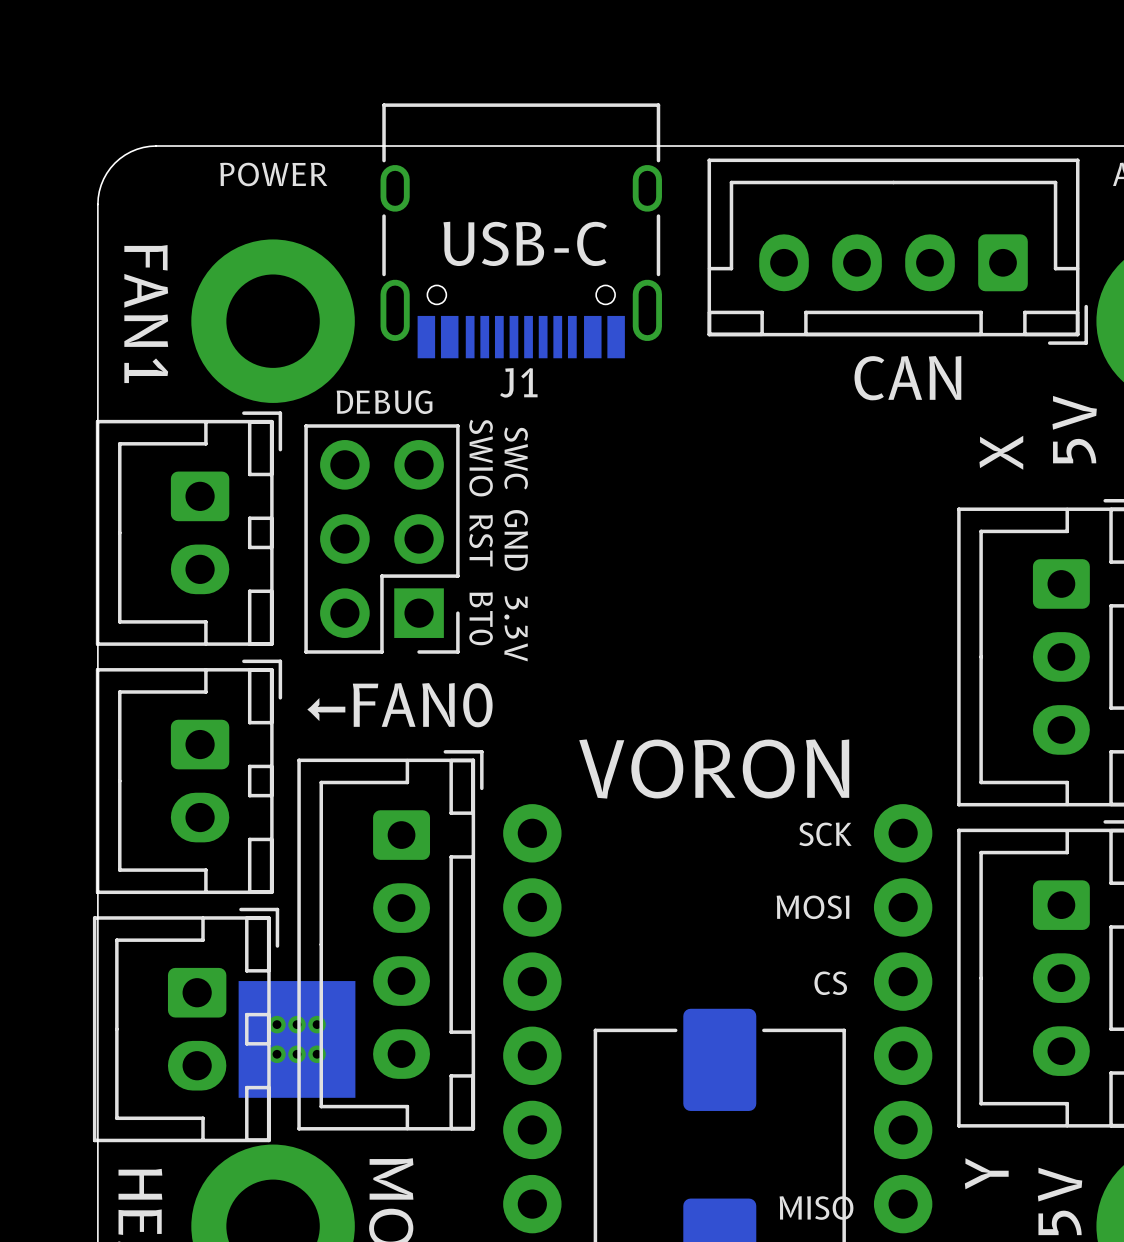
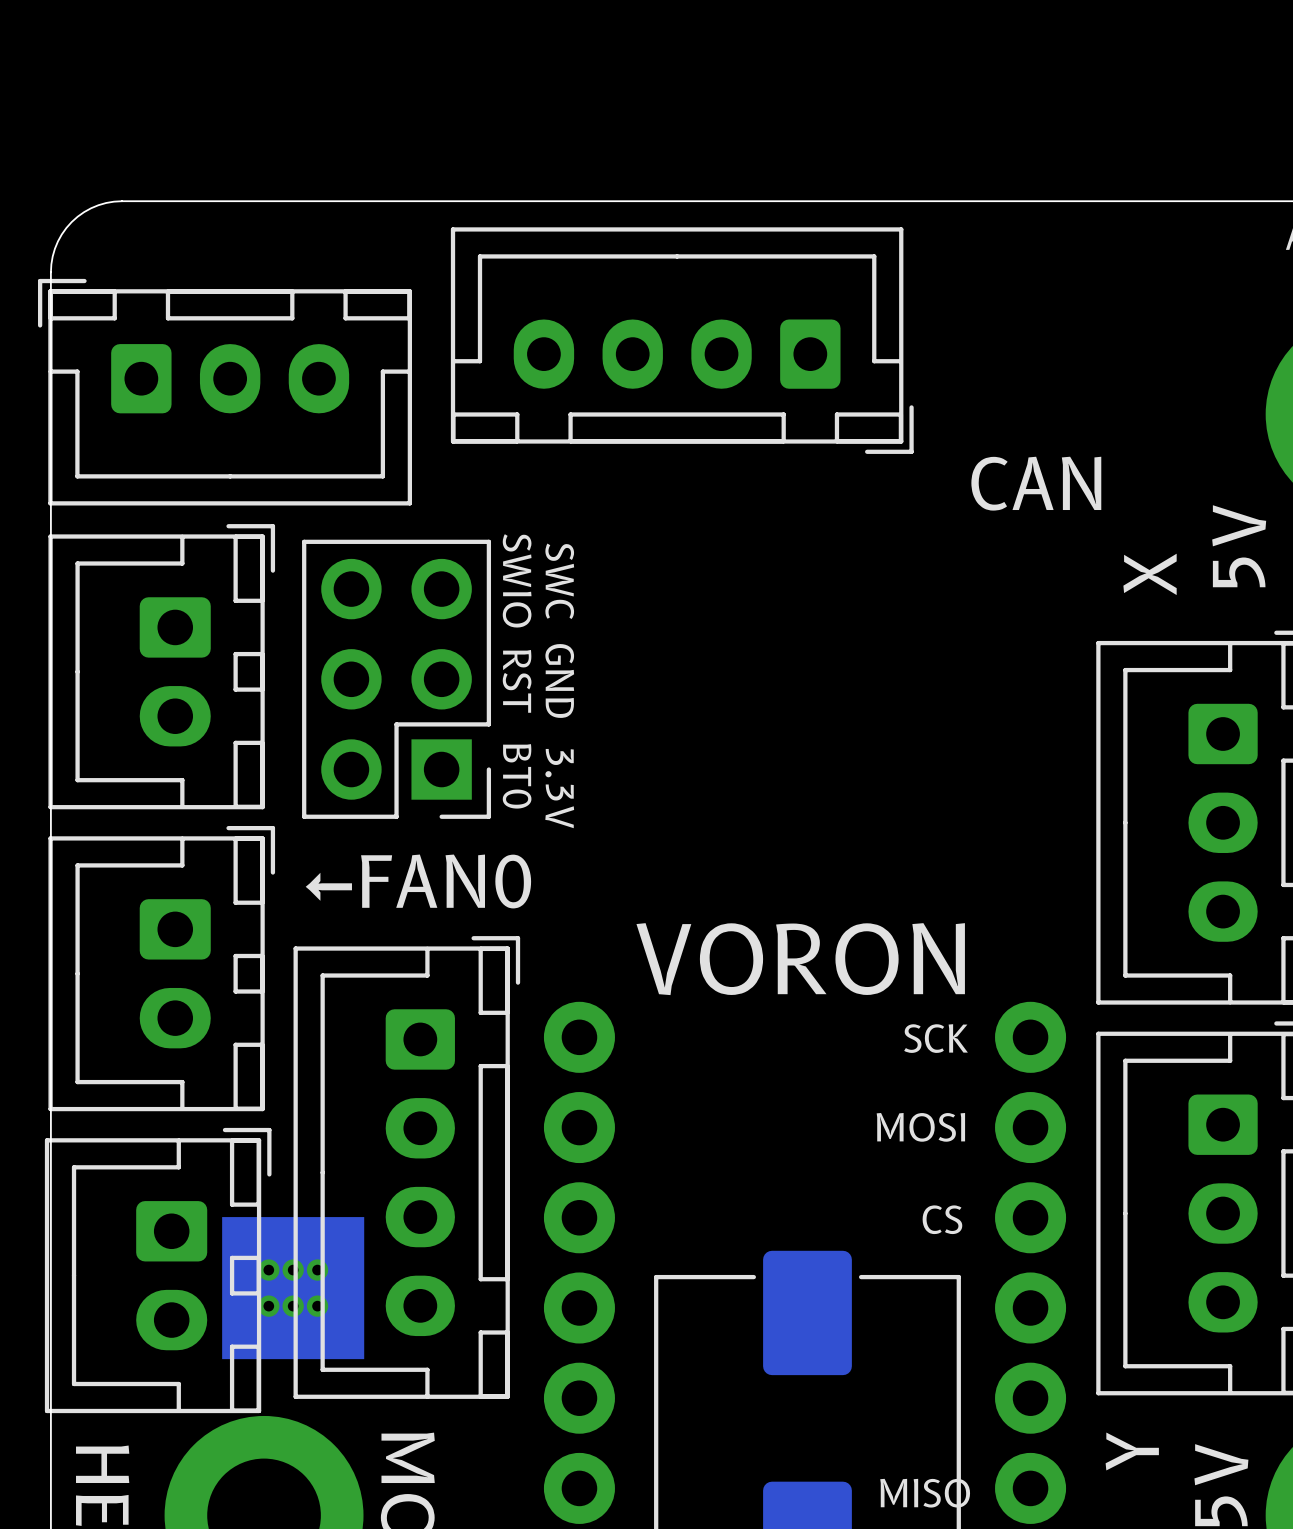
text: POWER (273, 174) -> none
J1: (521, 230) -> none
text: USB-C (525, 243) -> none
part position: (897, 251) -> (682, 340)
part: none -> (225, 392)
text: FAN1 (146, 314) -> none
part: (273, 321) -> none
text: DEBUG (384, 402) -> none

